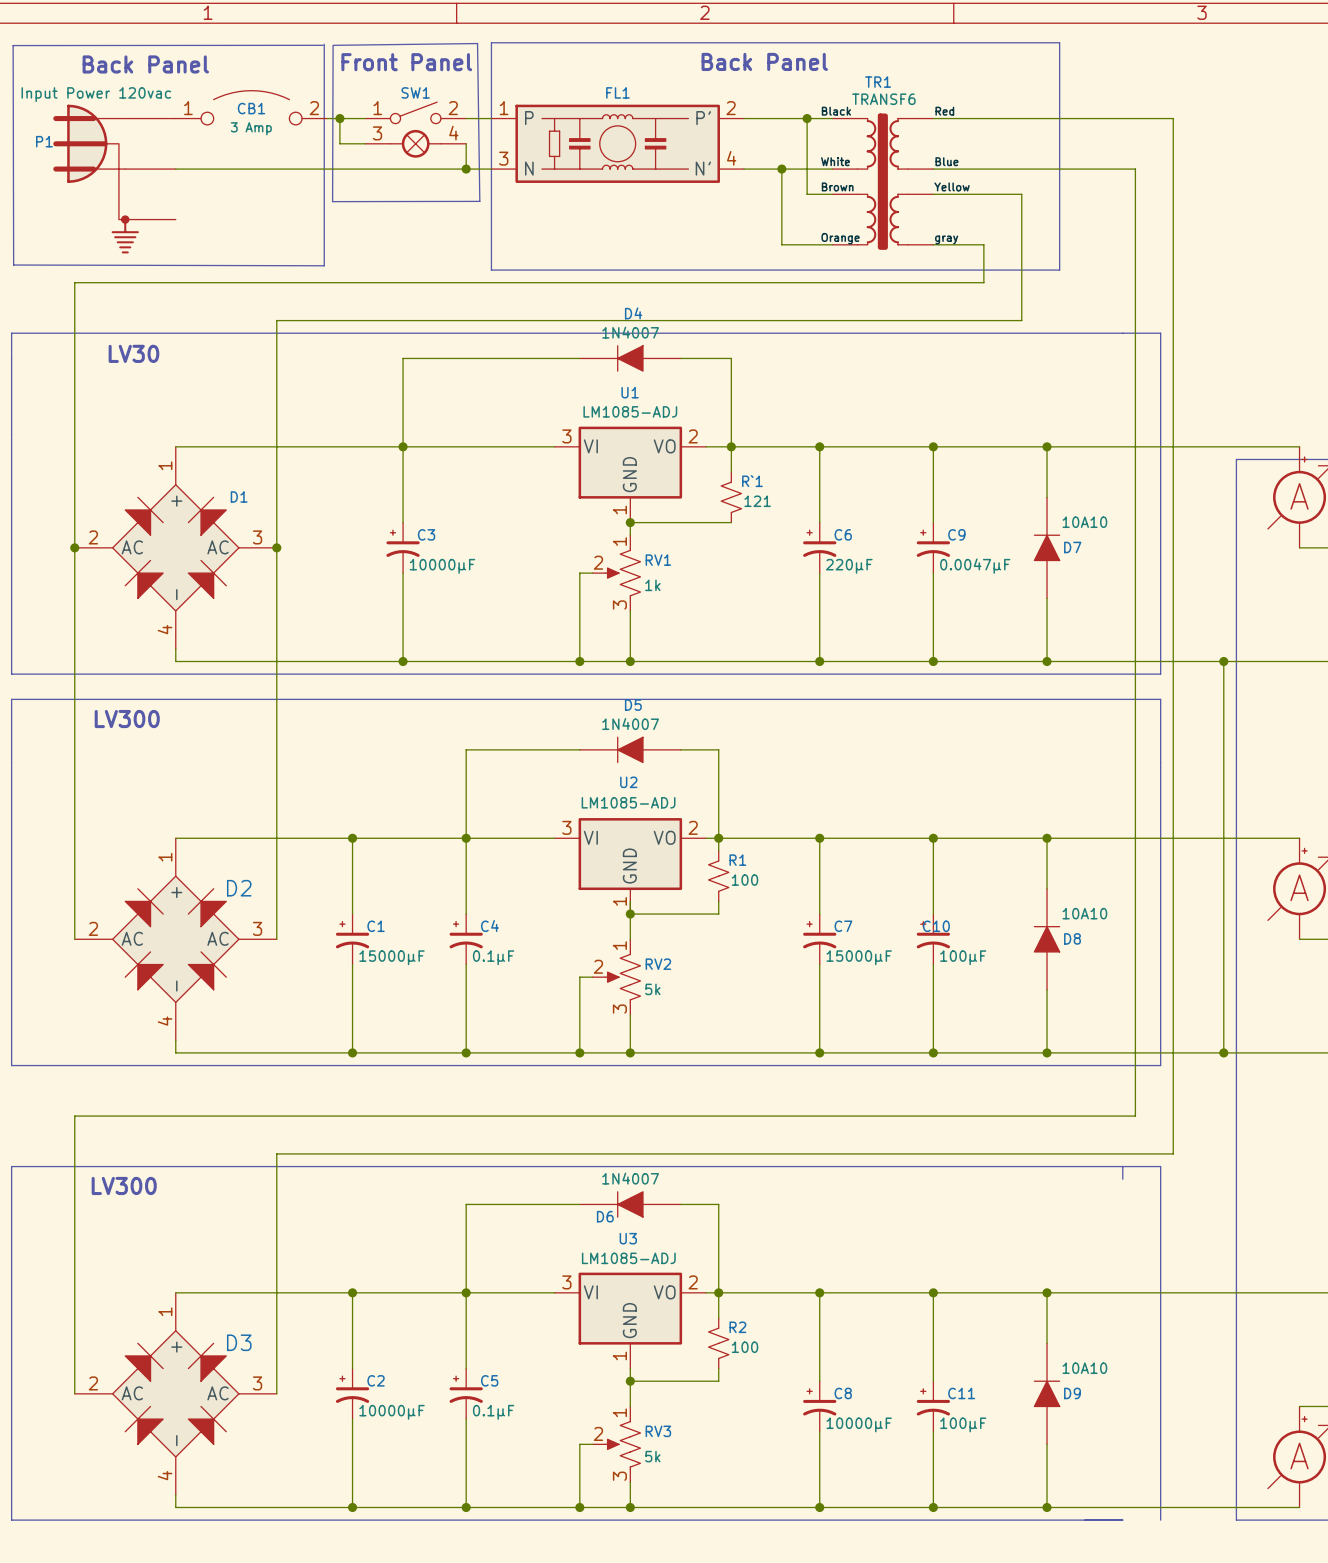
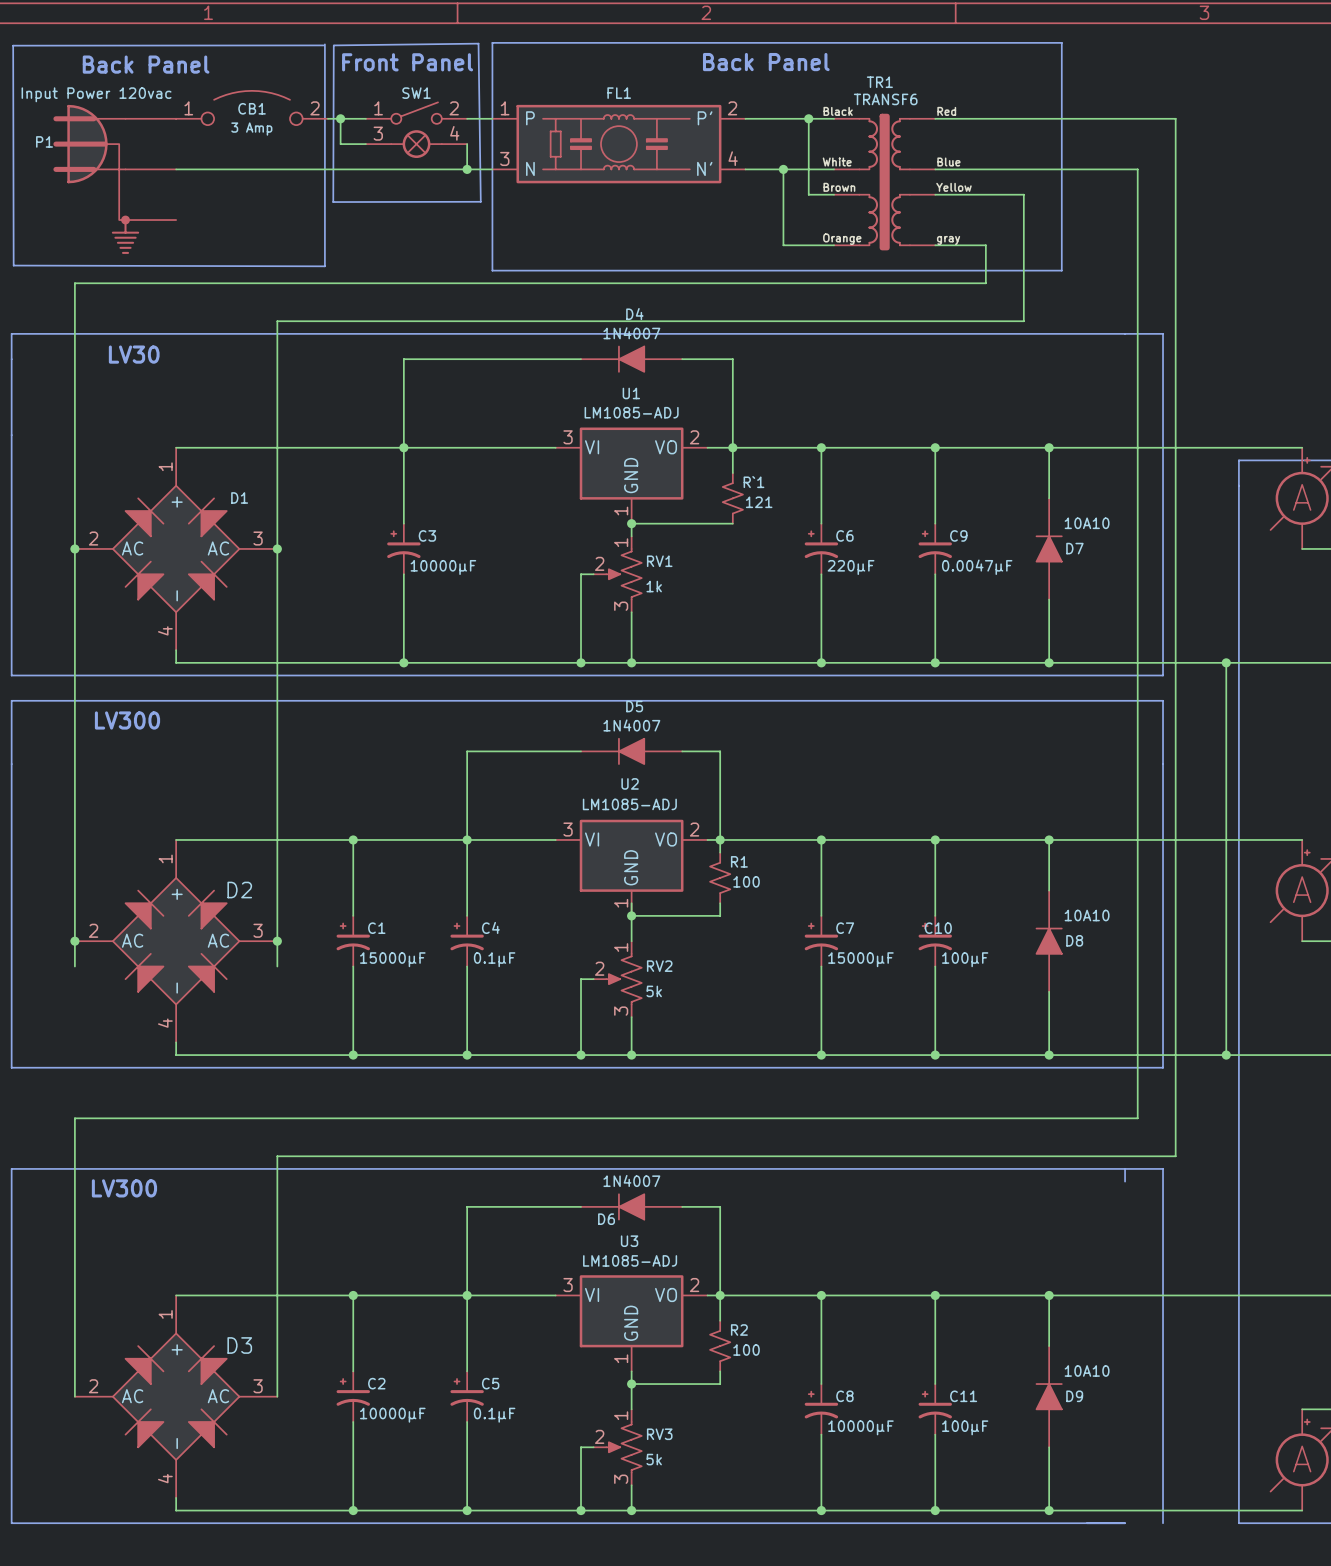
wire: none -> (74, 941) (74, 966)
junction: none -> (74, 941)
wire: none -> (277, 941) (277, 966)
junction: none -> (277, 941)

